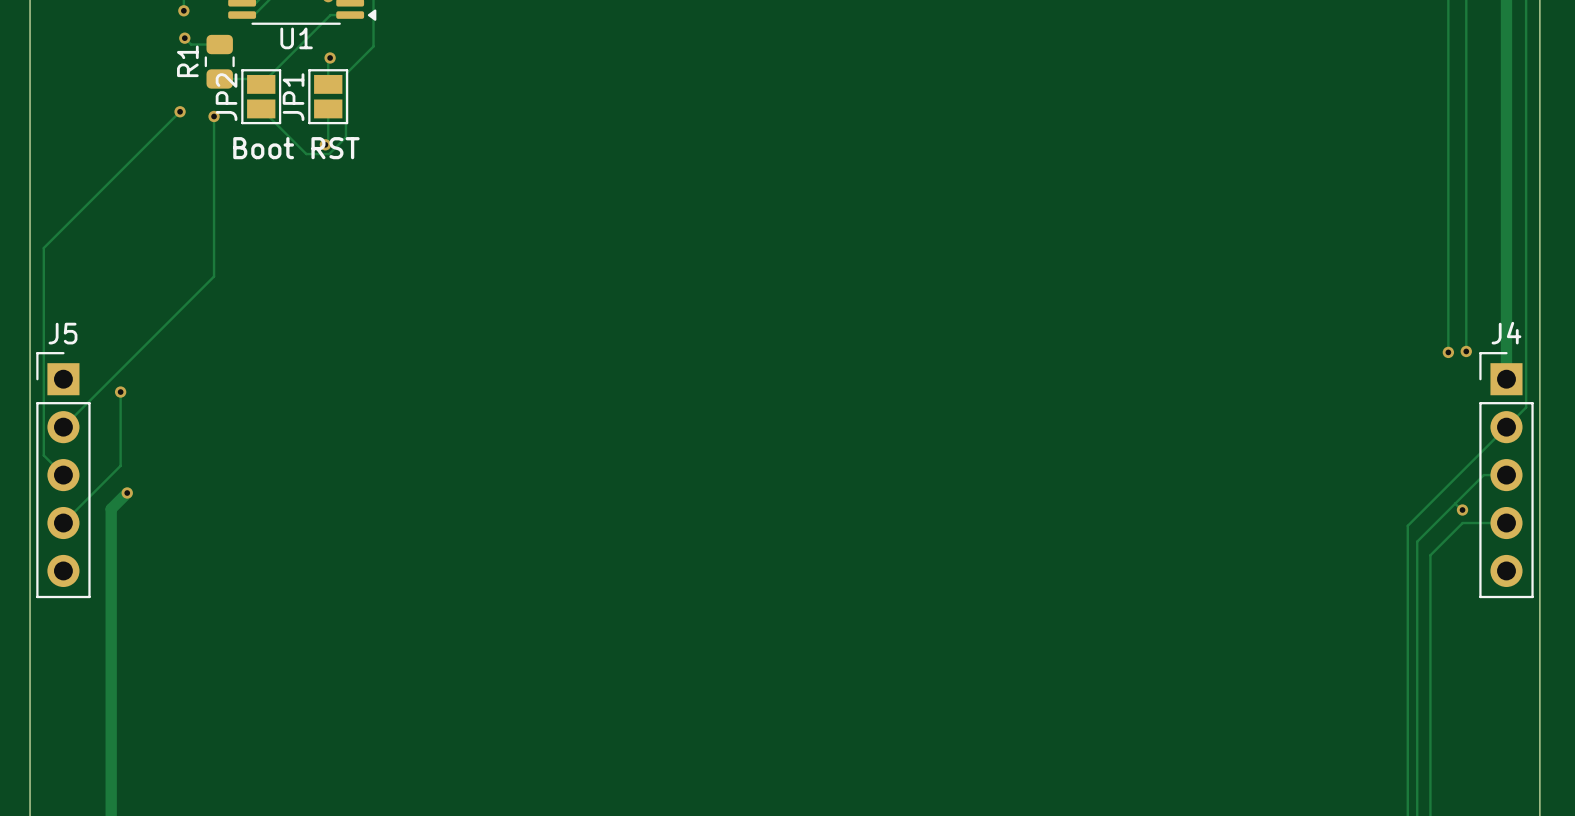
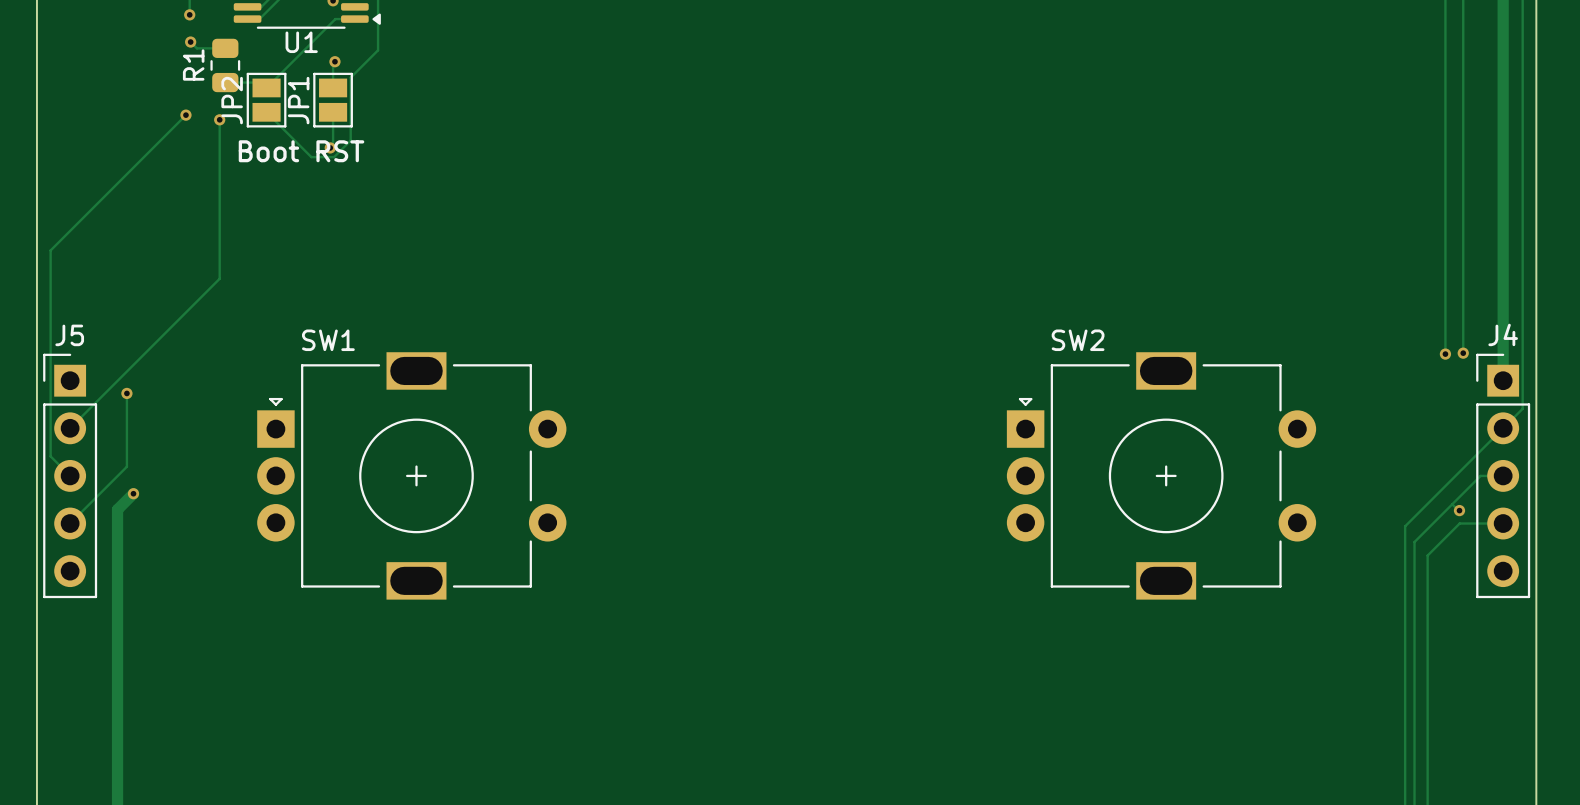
SW1: none -> (411, 475)
SW2: none -> (1161, 475)

